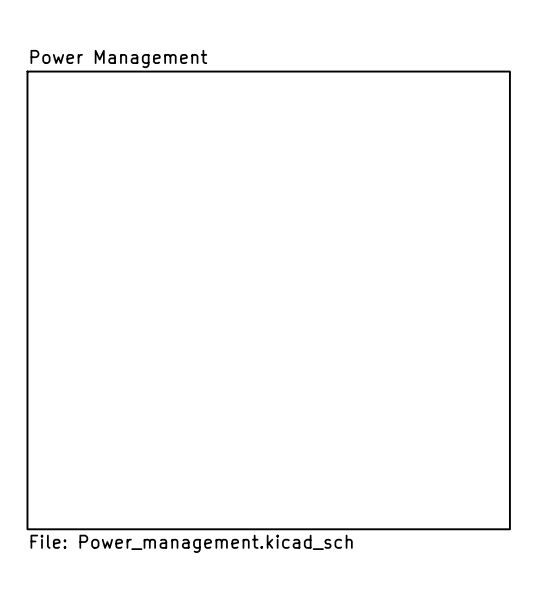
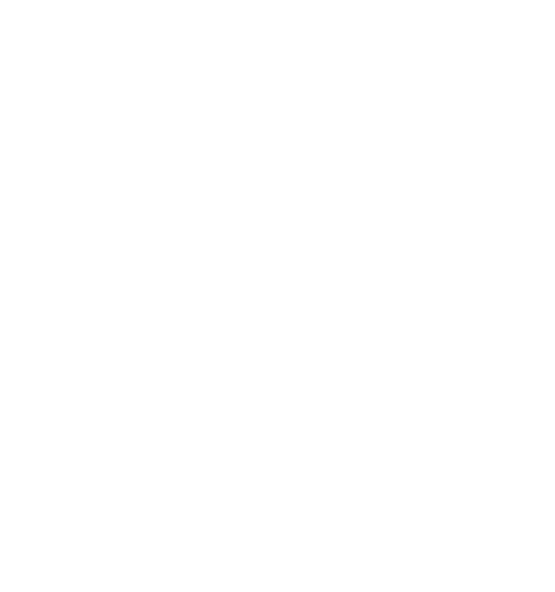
sheet Power Management: File: Power_management.kicad_sch (268, 300) -> none

